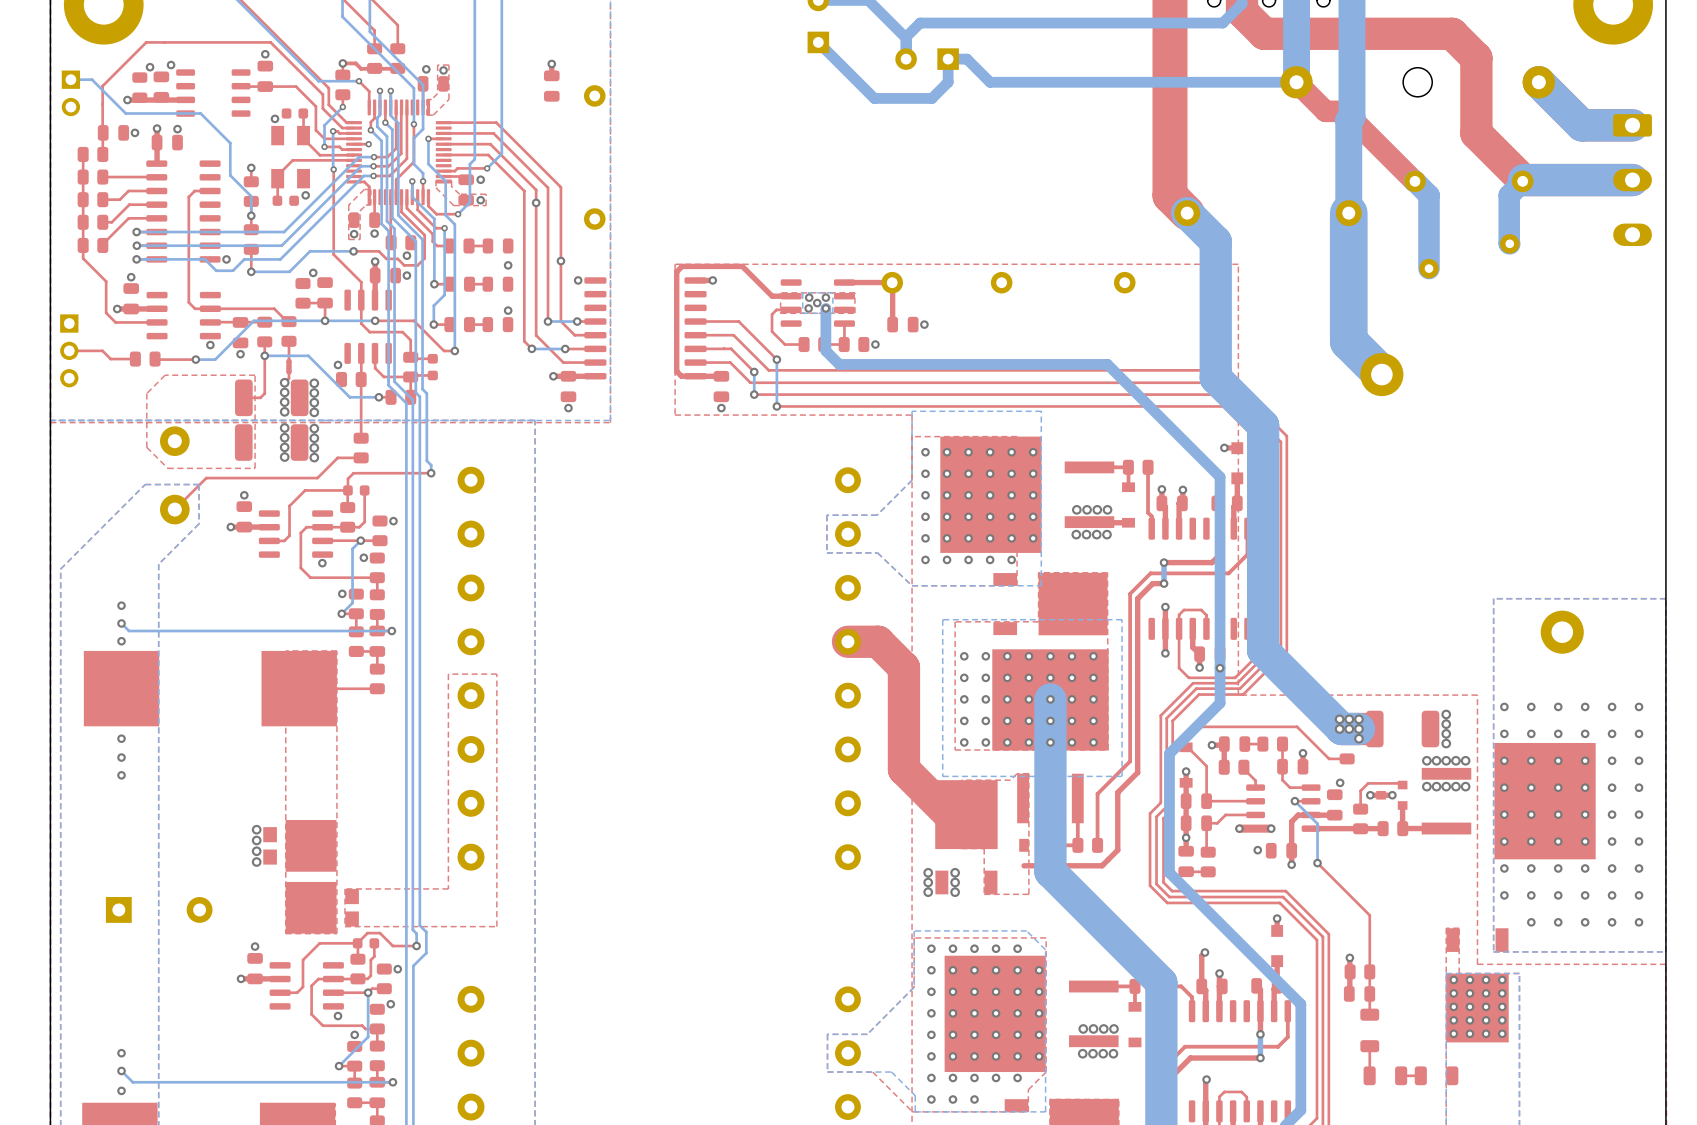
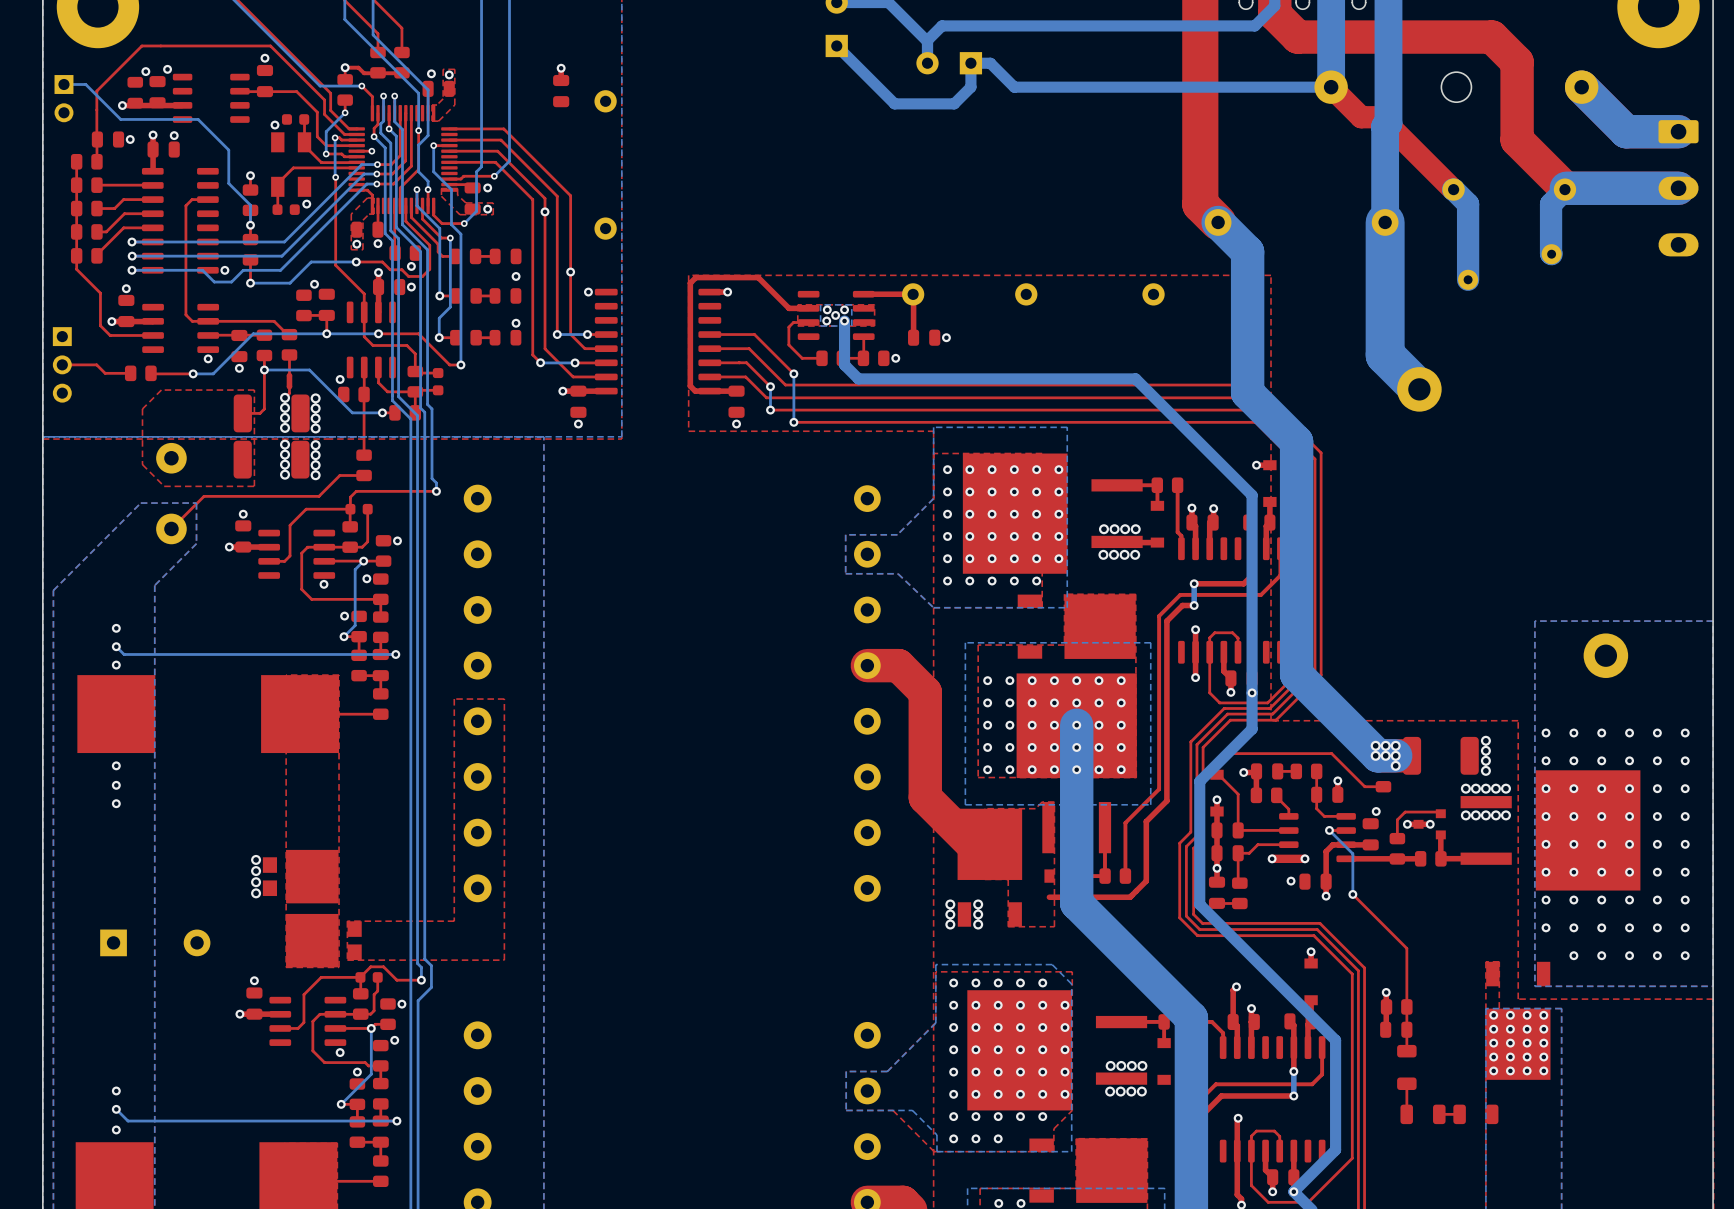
part footprint: [1231, 442, 1244, 485] -> [1263, 460, 1277, 507]
part footprint: [1271, 925, 1284, 968] -> [1304, 958, 1318, 1006]

